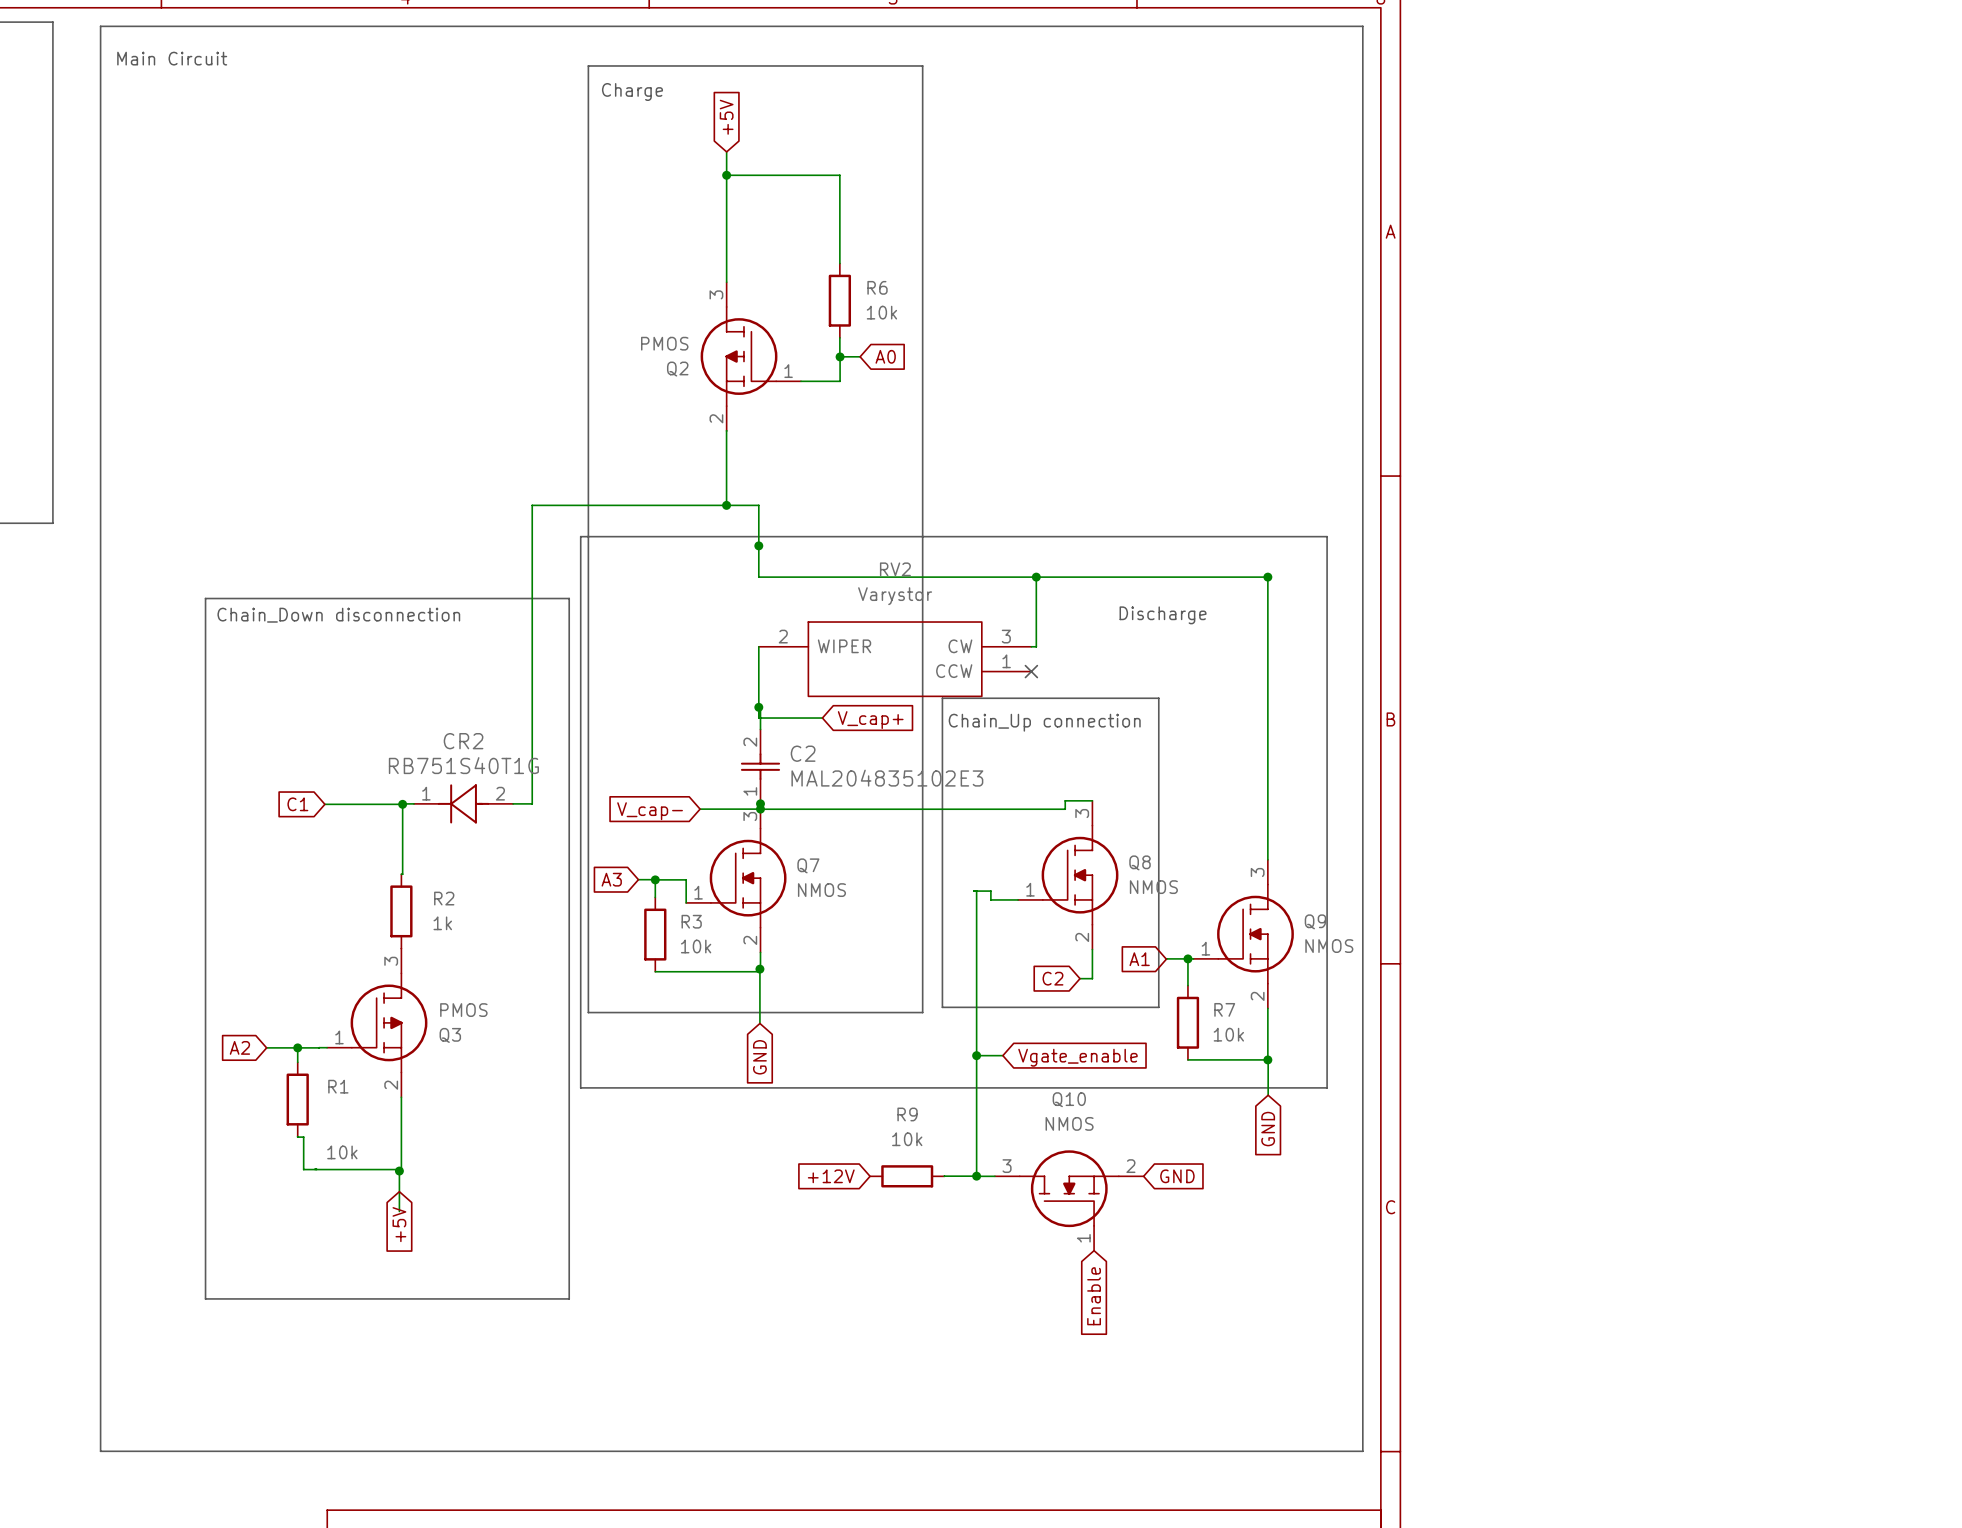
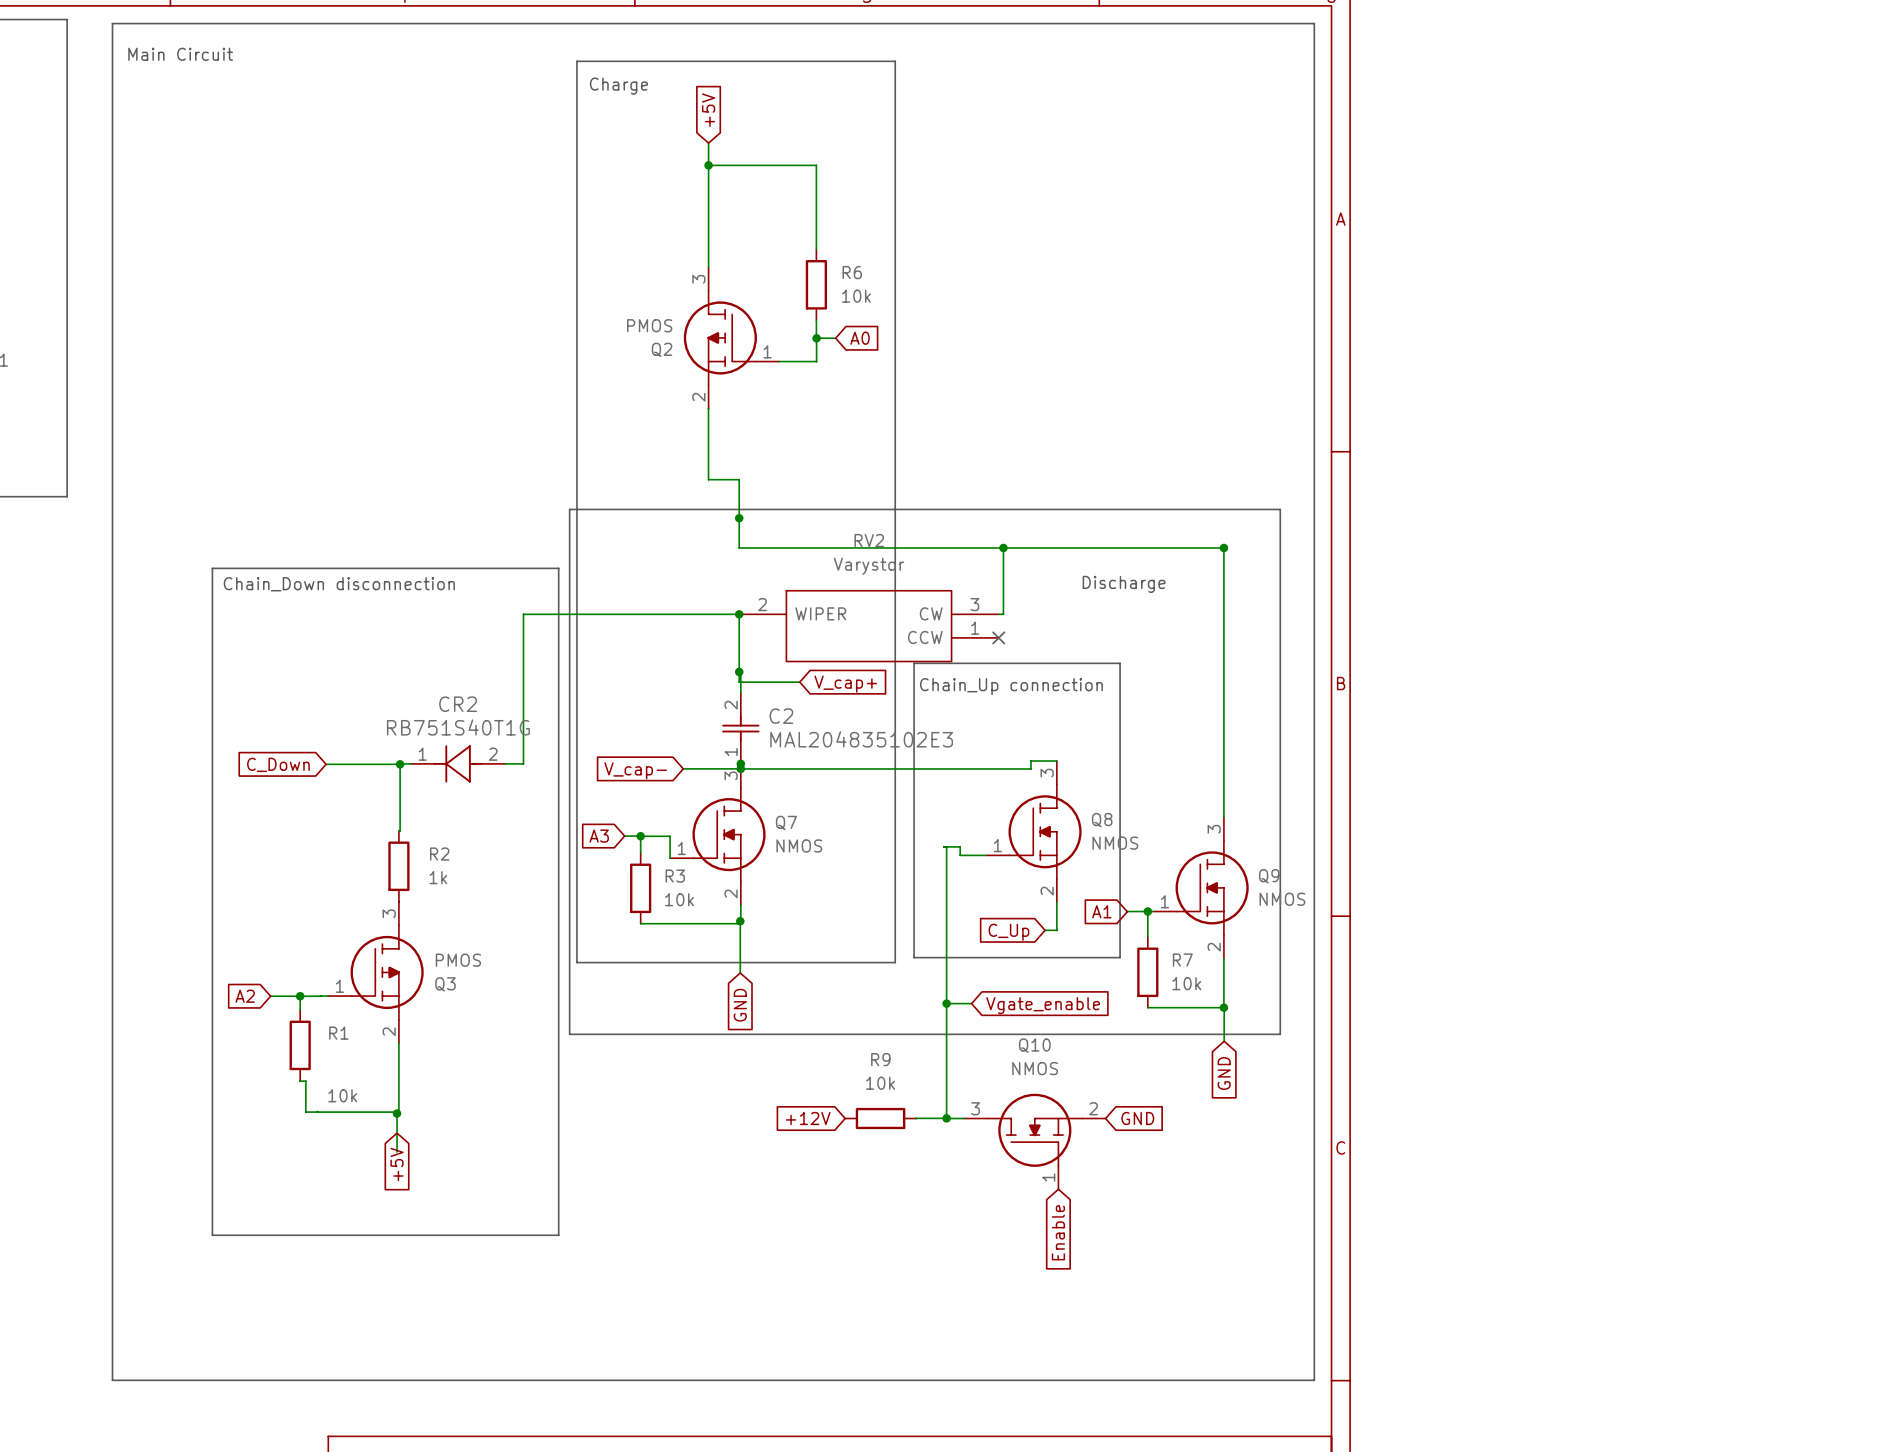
wire: (726, 505) (532, 505) (532, 646) -> (739, 614) (523, 614)
junction: (726, 505) -> none
junction: none -> (739, 614)
global label: C1 (297, 804) -> C_Down (278, 764)
global label: C2 (1052, 978) -> C_Up (1008, 932)

